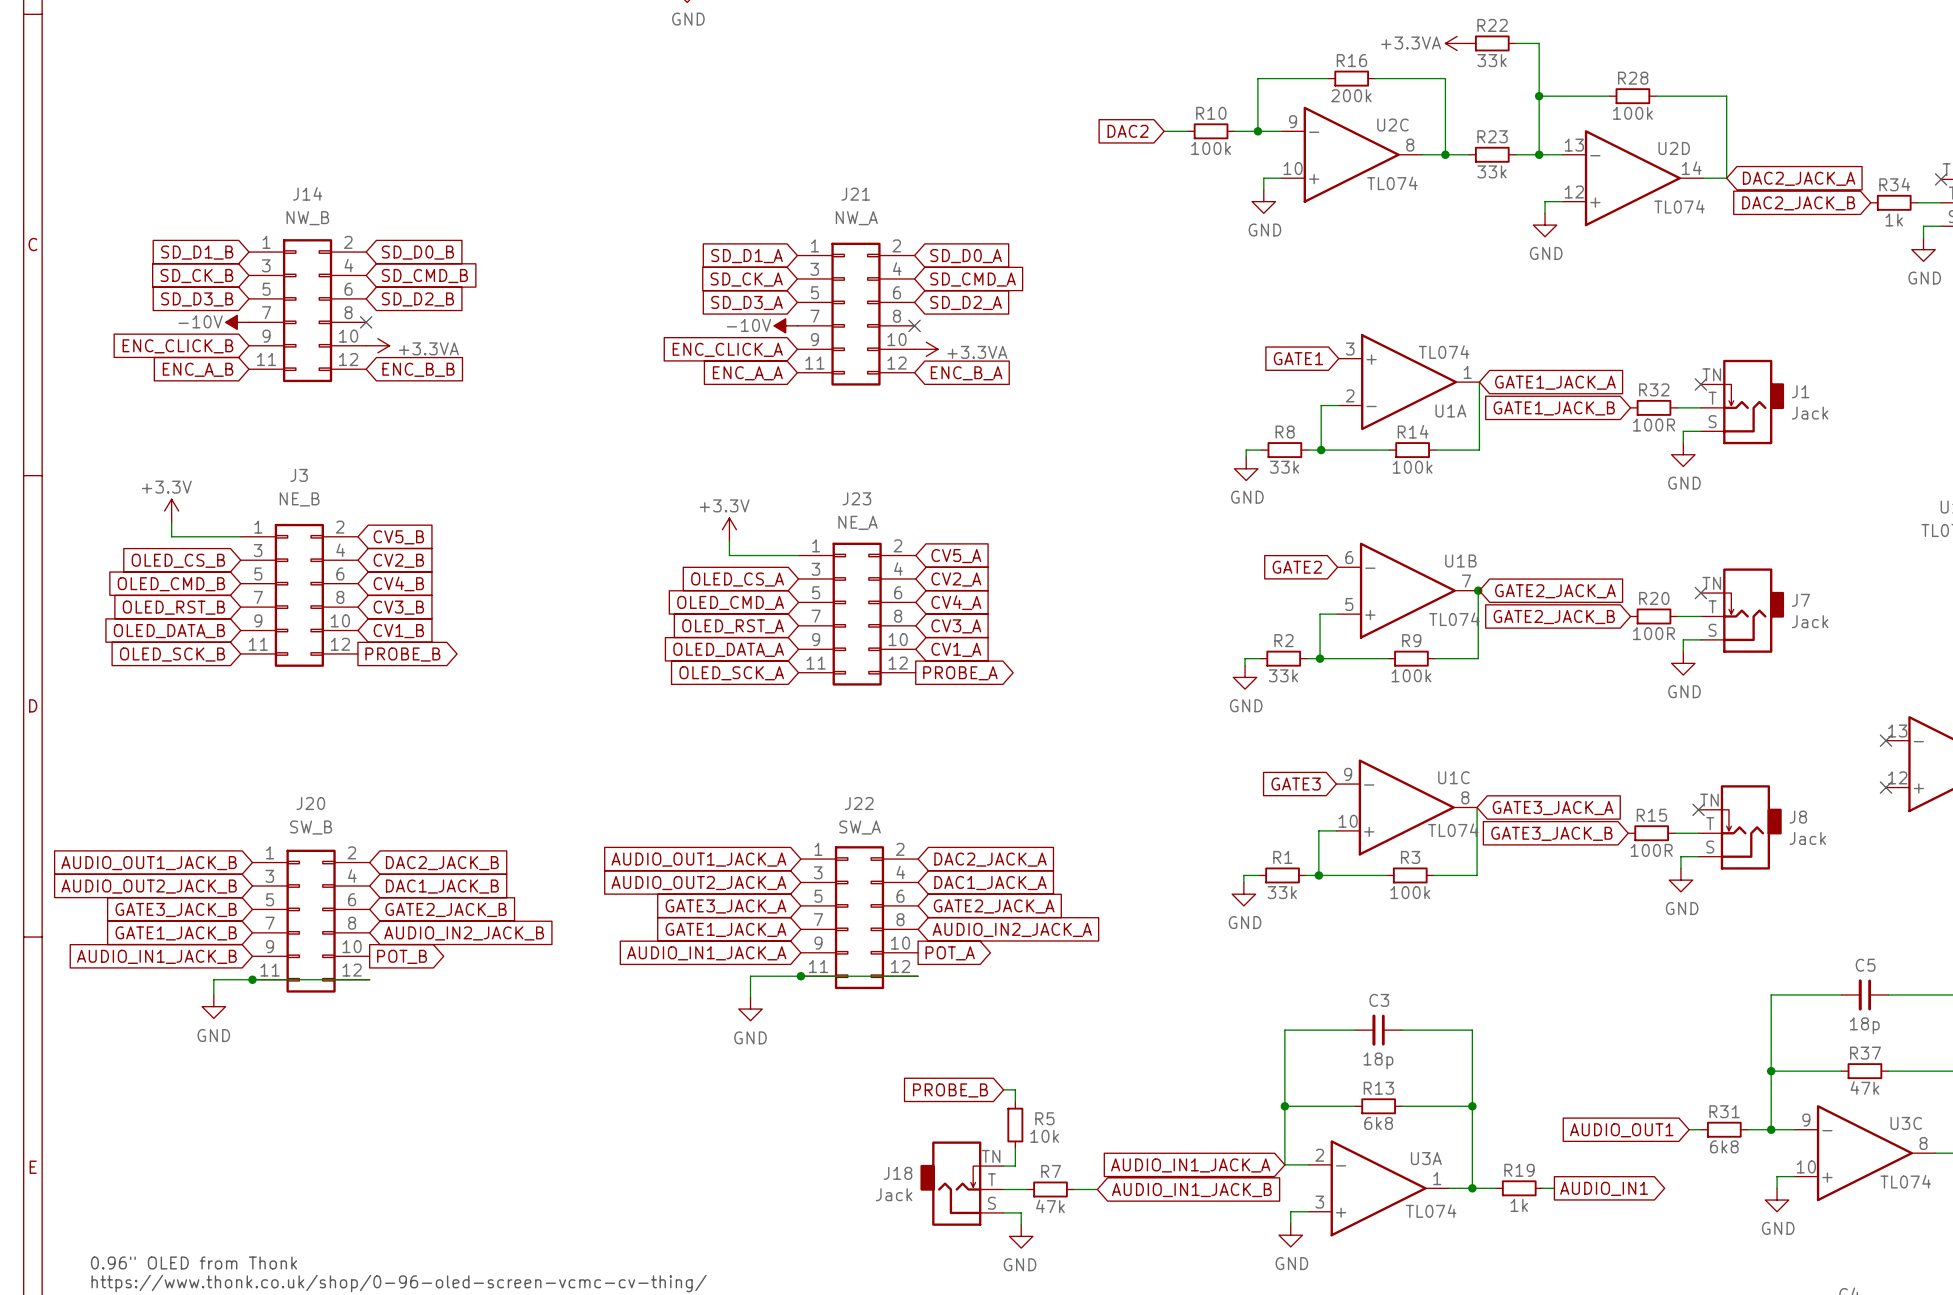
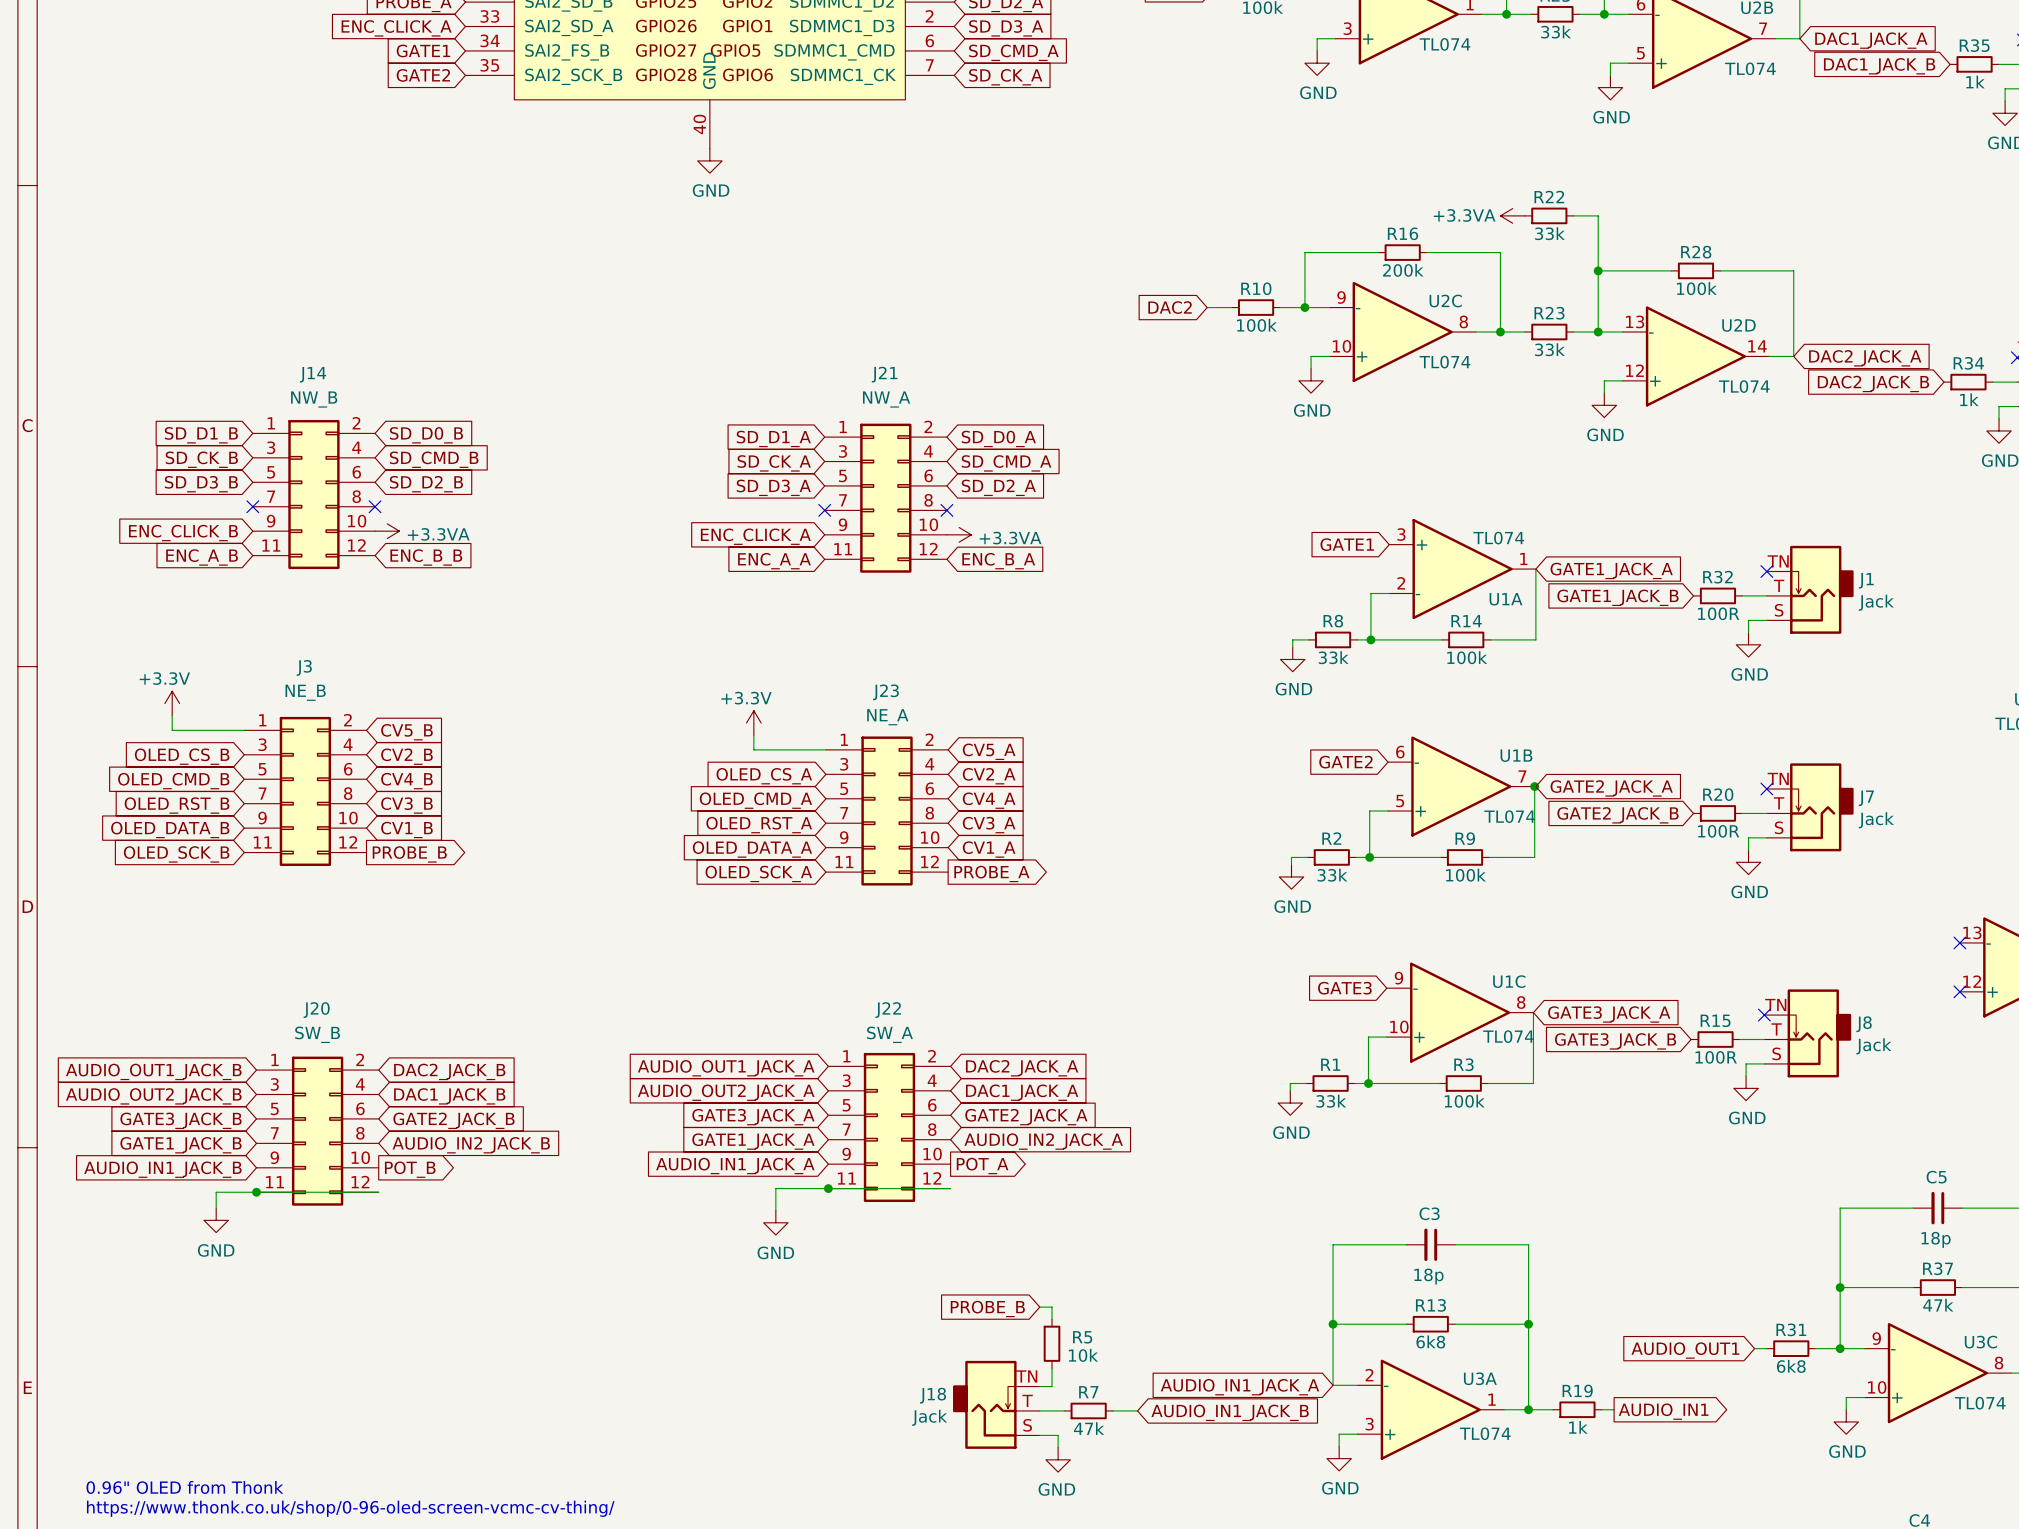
power symbol: -10V (237, 322) -> none
no-connect mark: none -> (252, 506)
power symbol: -10V (785, 325) -> none
no-connect mark: none -> (824, 510)

